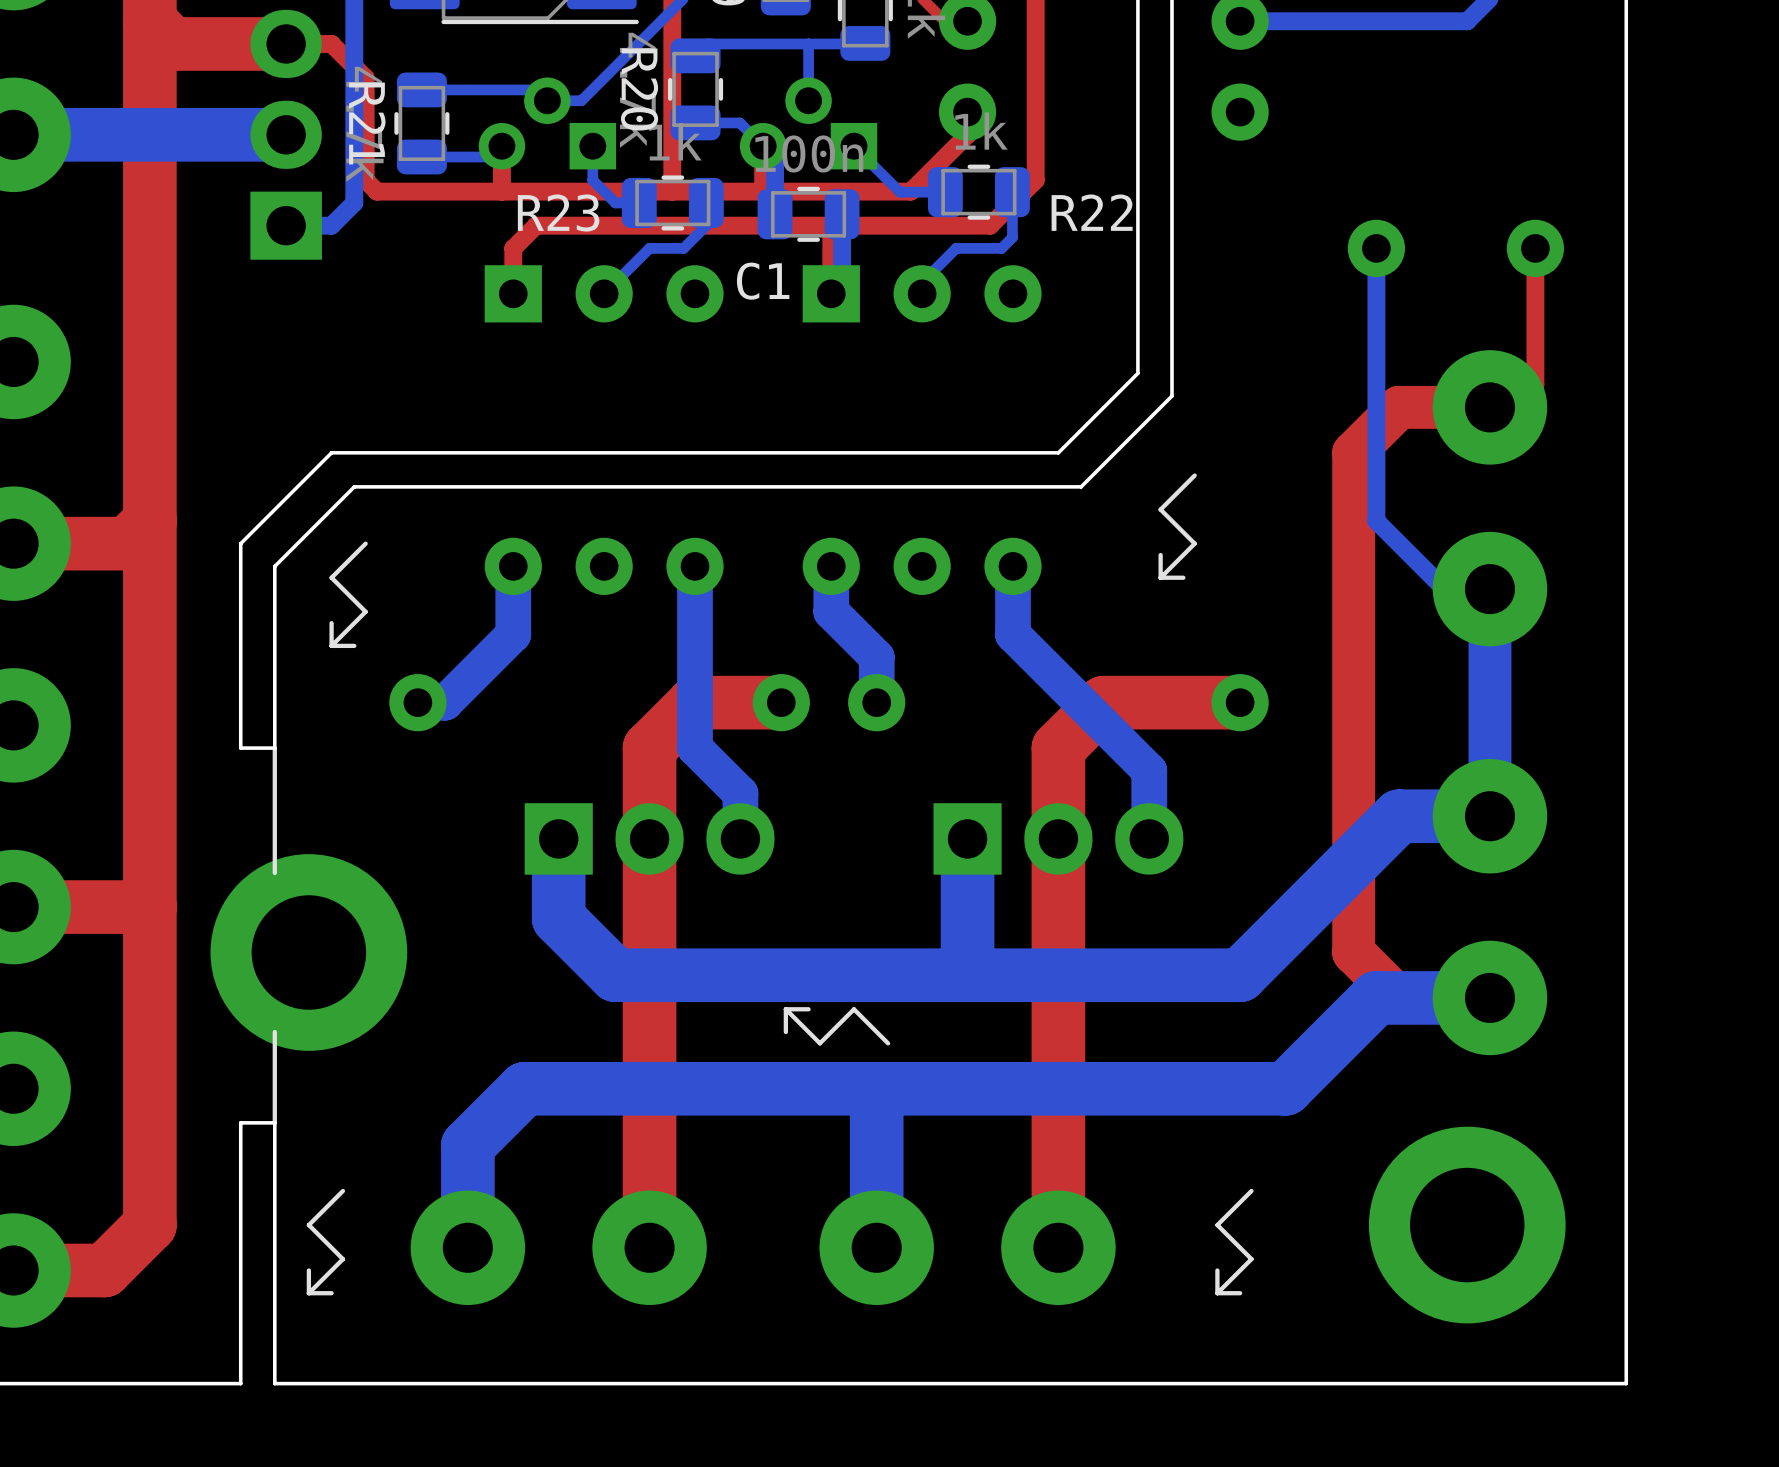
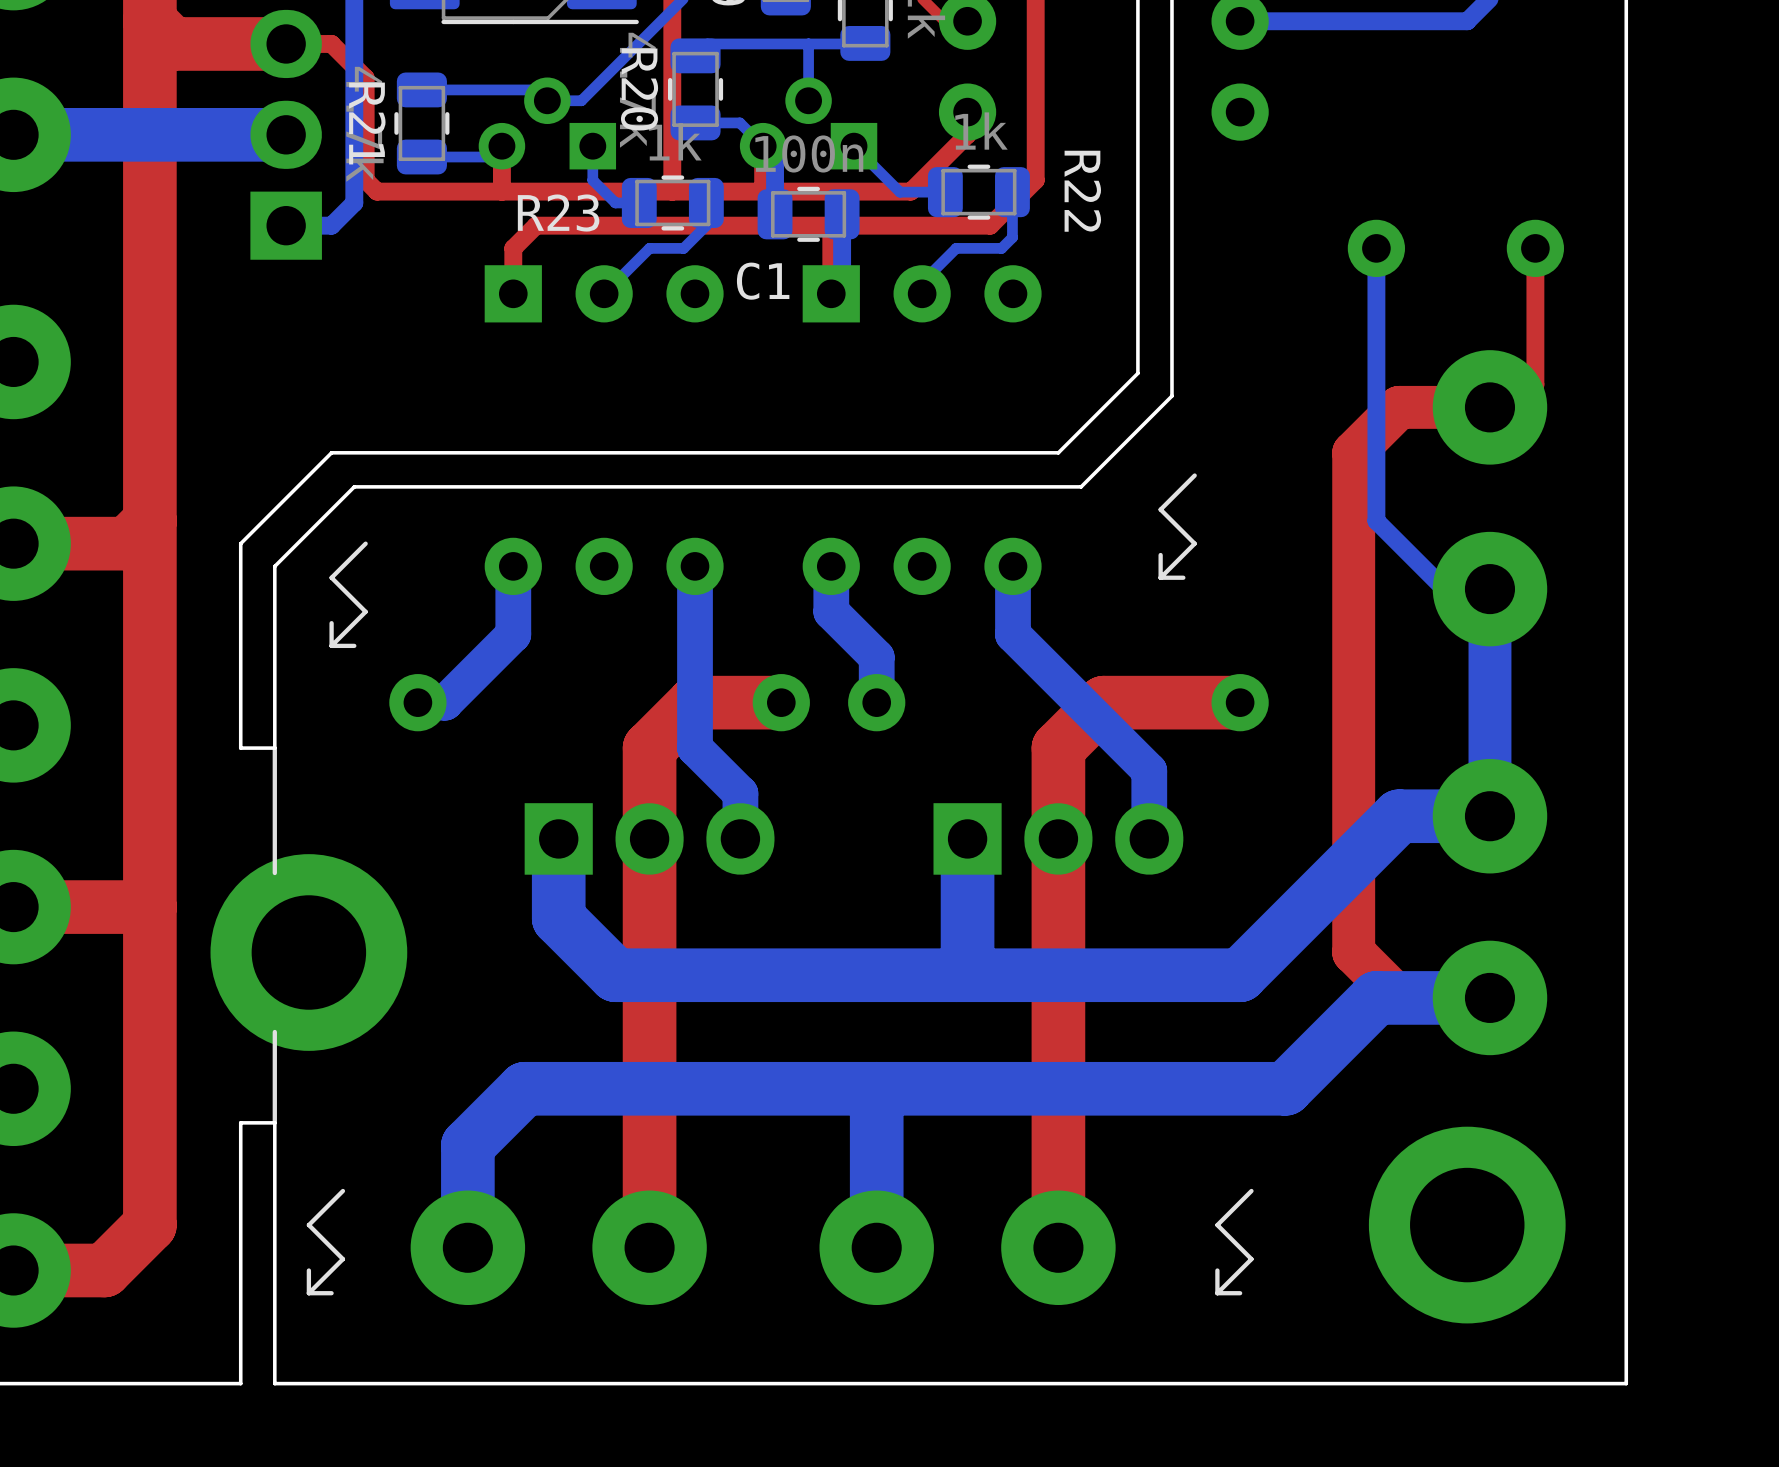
R22 name rotation: 0° (1092, 212) -> 90° clockwise (1082, 191)
line: (785, 1009) (819, 1043) (854, 1009) (888, 1043) -> none
line: (785, 1009) (785, 1032) -> none
line: (808, 1009) (785, 1009) -> none

